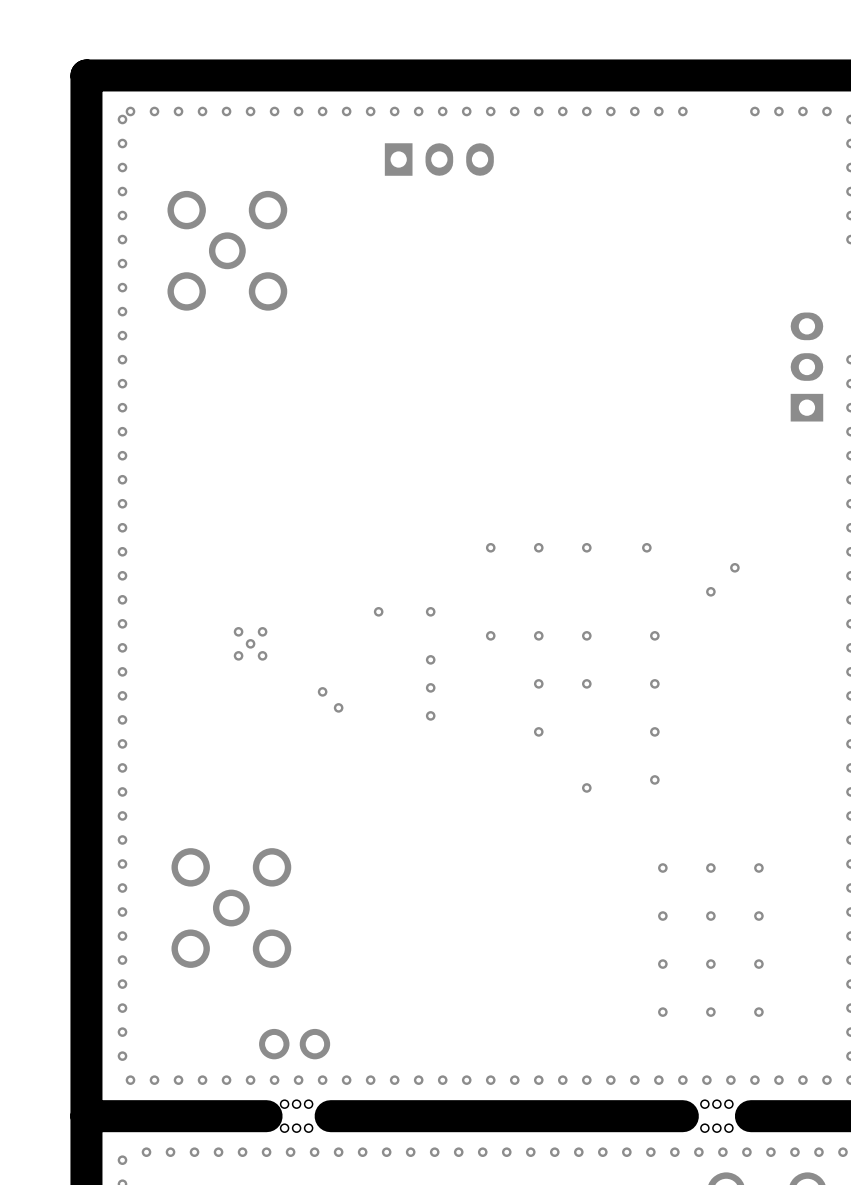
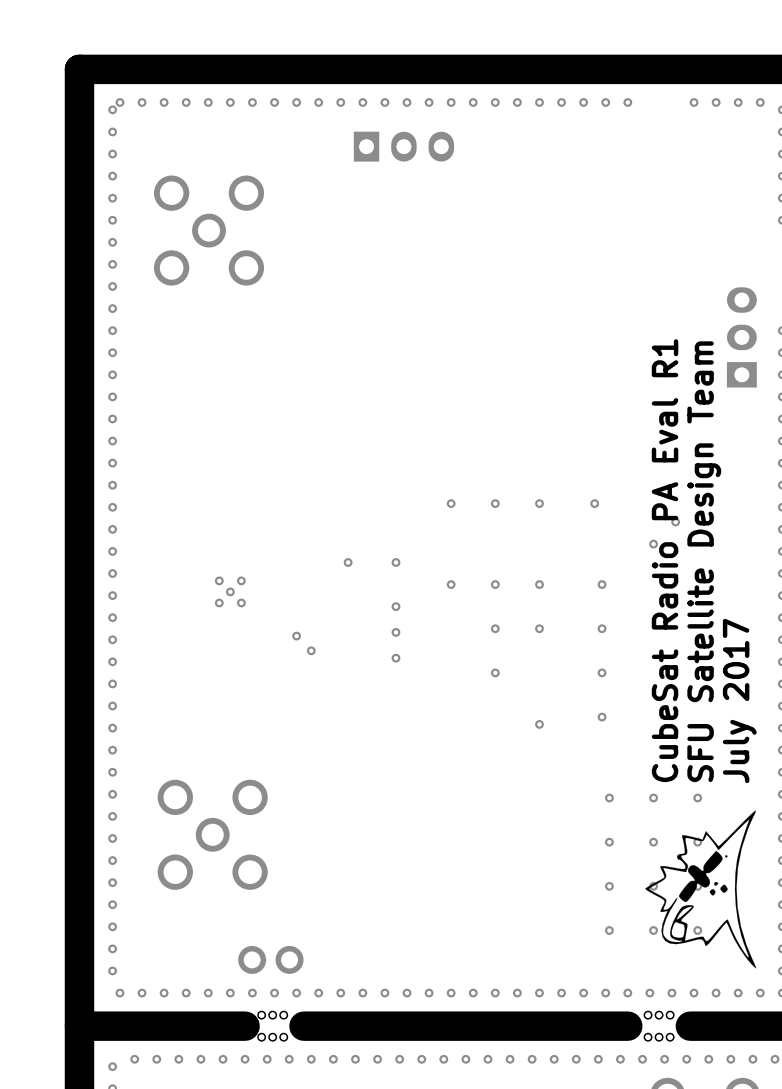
text: none -> CubeSat Radio PA Eval R1 (665, 560)
text: none -> SFU Satellite Design Team (704, 561)
text: none -> July 2017 (739, 701)
drawing: none -> [645, 810, 757, 969]

